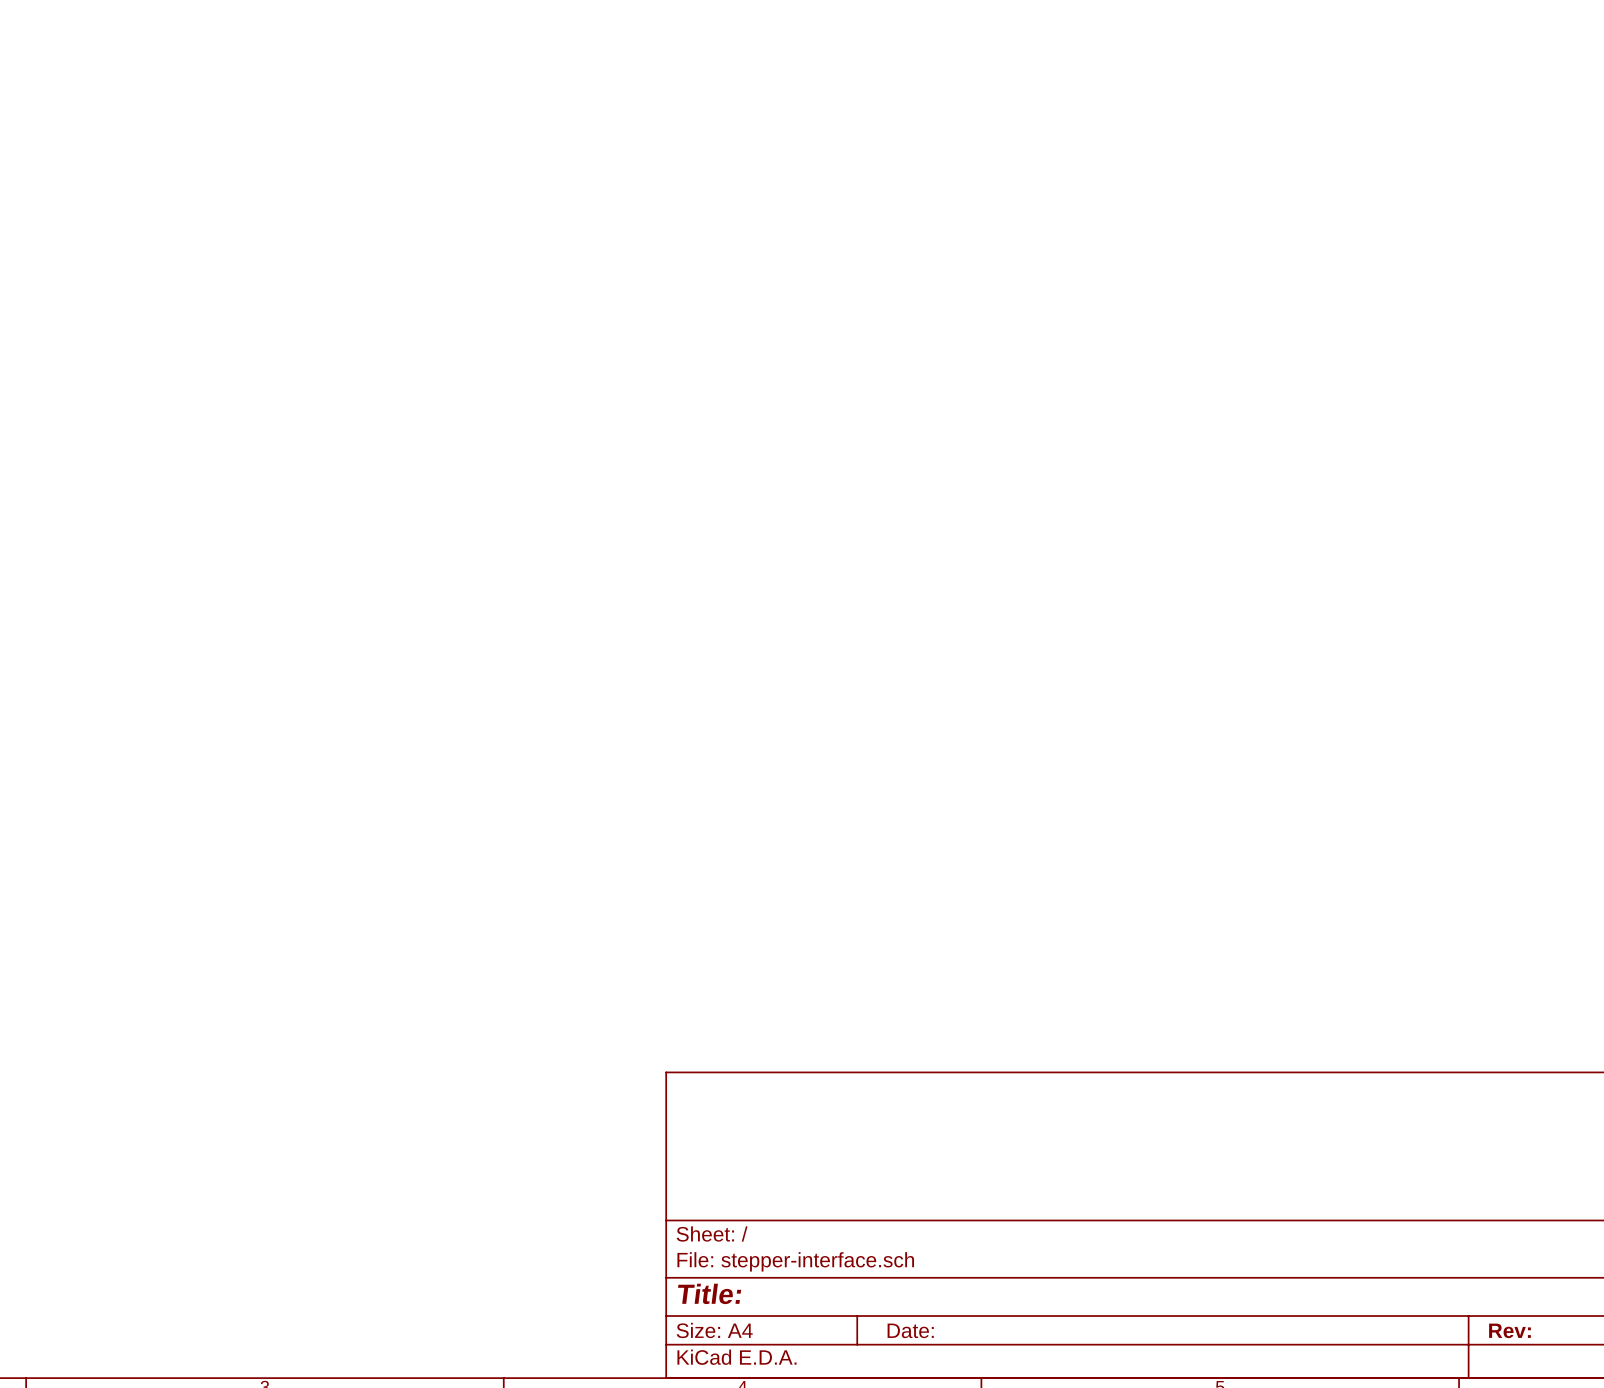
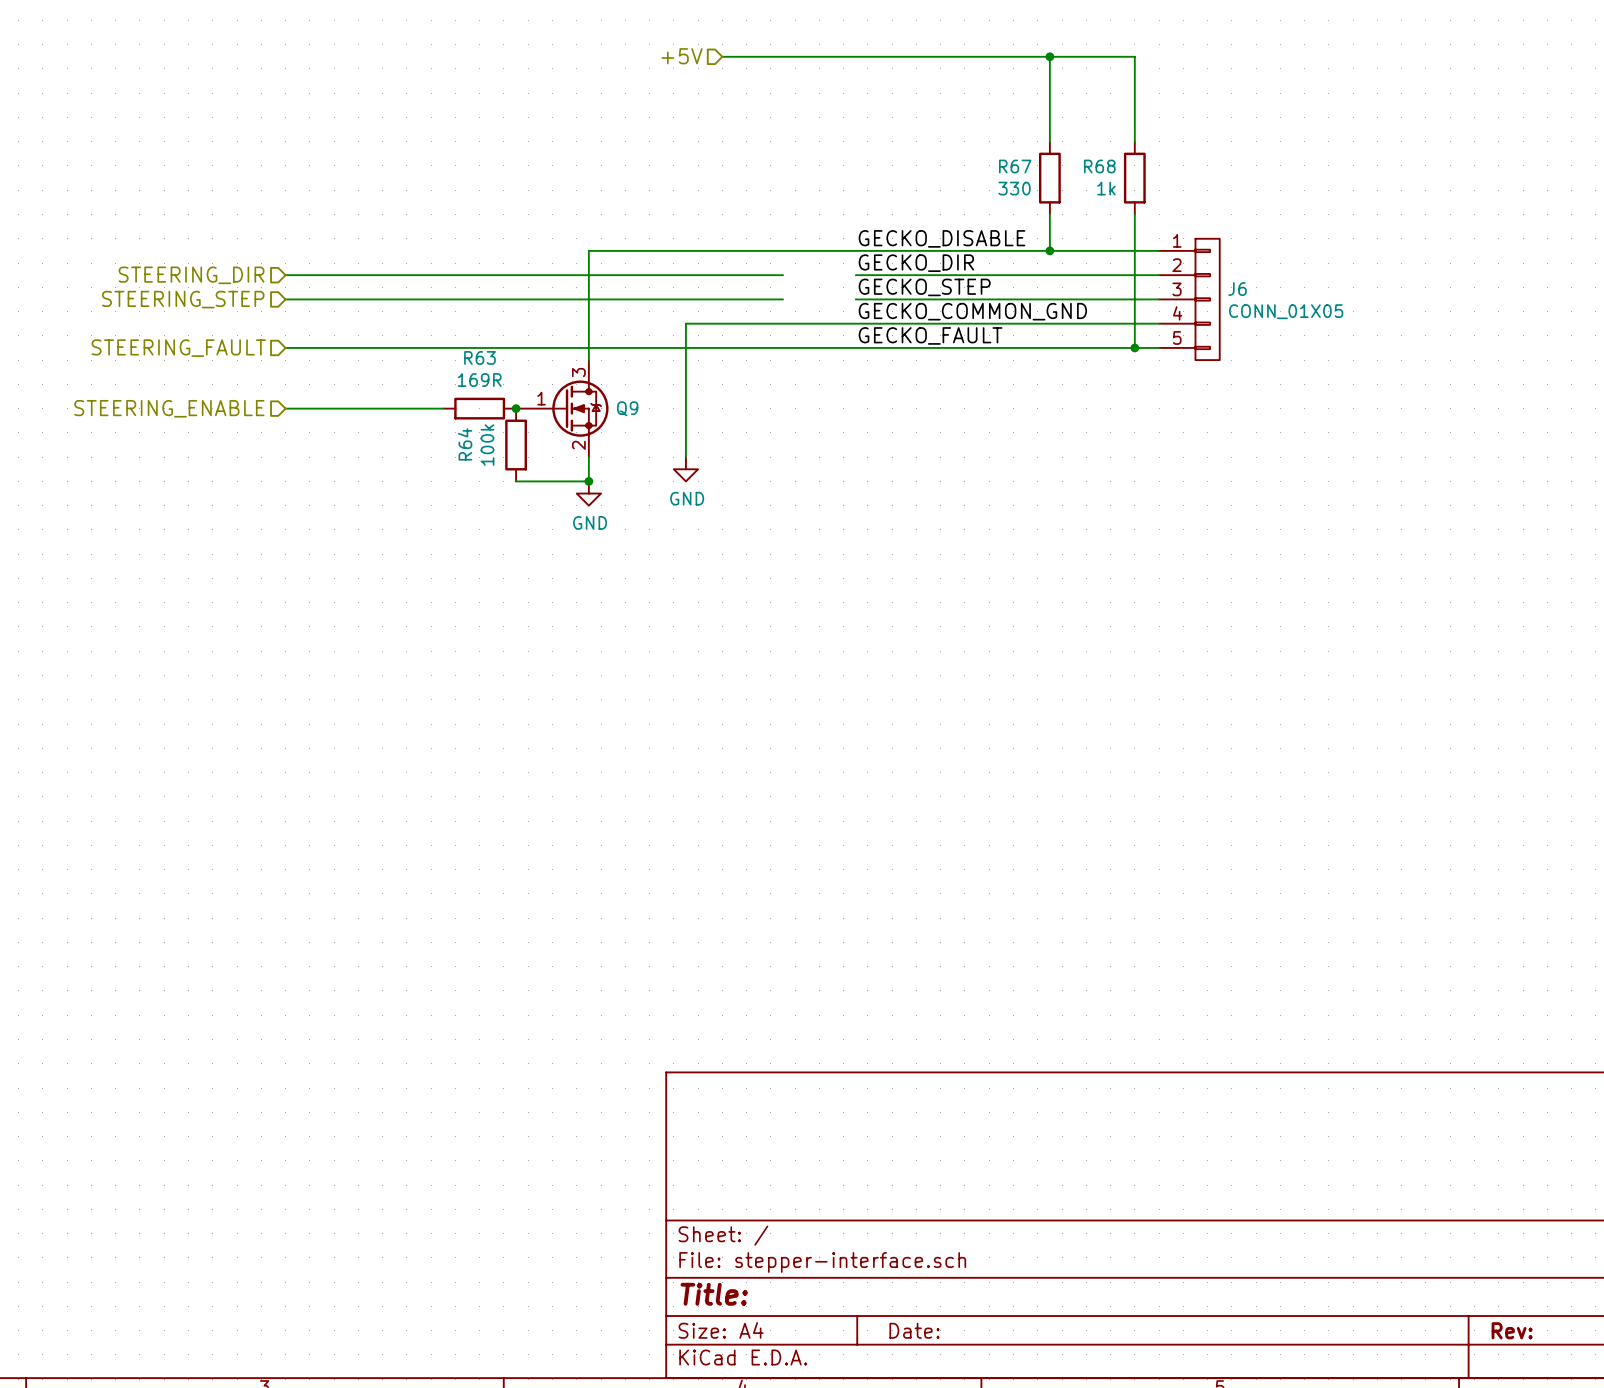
hierarchical label: none -> +5V (682, 56)
wire: none -> (722, 56) (1134, 56) (1134, 141)
wire: none -> (1049, 56) (1049, 141)
junction: none -> (1049, 56)
R67: none -> 330 (1049, 178)
R68: none -> 1k (1134, 178)
wire: none -> (1049, 214) (1049, 250)
wire: none -> (1134, 214) (1134, 347)
label: none -> GECKO_DISABLE (942, 238)
junction: none -> (1049, 250)
wire: none -> (1159, 250) (588, 250) (588, 360)
label: none -> GECKO_DIR (916, 263)
wire: none -> (285, 275) (782, 275)
wire: none -> (855, 275) (1159, 275)
hierarchical label: none -> STEERING_DIR (191, 275)
label: none -> GECKO_STEP (924, 287)
wire: none -> (285, 299) (782, 299)
wire: none -> (855, 299) (1159, 299)
J6: none -> CONN_01X05 (1189, 299)
hierarchical label: none -> STEERING_STEP (183, 299)
label: none -> GECKO_COMMON_GND (972, 311)
wire: none -> (1159, 323) (685, 323) (685, 457)
label: none -> GECKO_FAULT (930, 335)
wire: none -> (285, 347) (1159, 347)
junction: none -> (1134, 347)
hierarchical label: none -> STEERING_FAULT (178, 348)
wire: none -> (285, 408) (443, 408)
R63: none -> 169R (479, 408)
junction: none -> (516, 408)
Q9: none -> (562, 408)
hierarchical label: none -> STEERING_ENABLE (169, 408)
R64: none -> 100k (516, 445)
wire: none -> (588, 457) (588, 481) (516, 481)
power symbol: none -> GND (685, 469)
junction: none -> (588, 481)
power symbol: none -> GND (588, 493)

